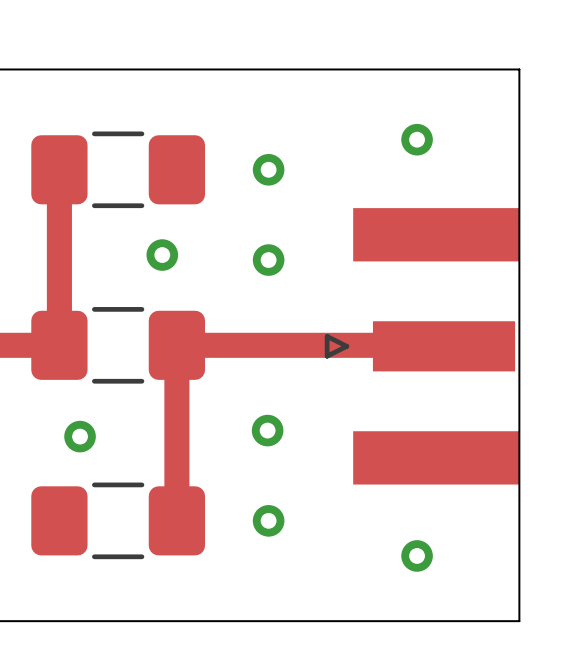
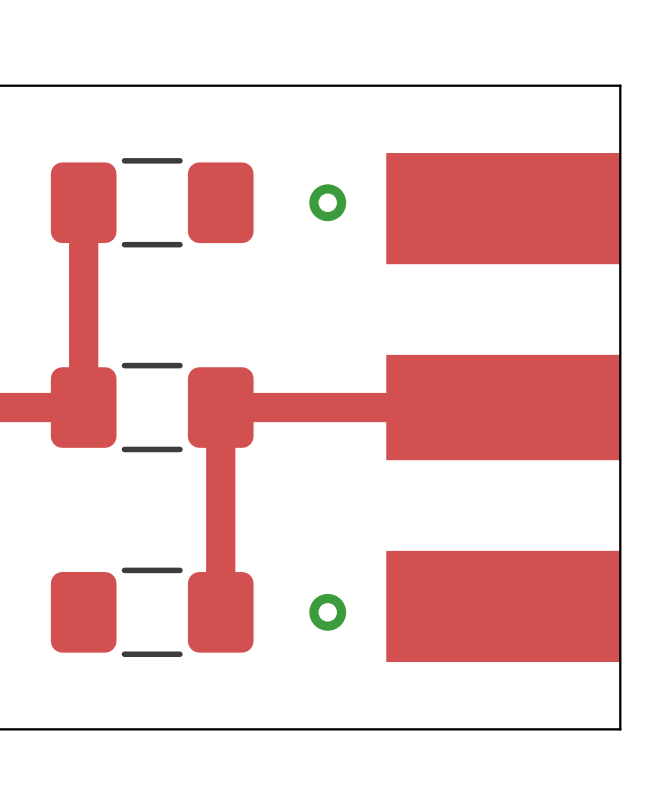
via: (417, 139) -> none
part footprint: [324, 208, 520, 485] -> [386, 153, 621, 663]
via: (162, 255) -> none
via: (268, 260) -> none
via: (267, 430) -> none
via: (80, 436) -> none
via: (417, 555) -> none

